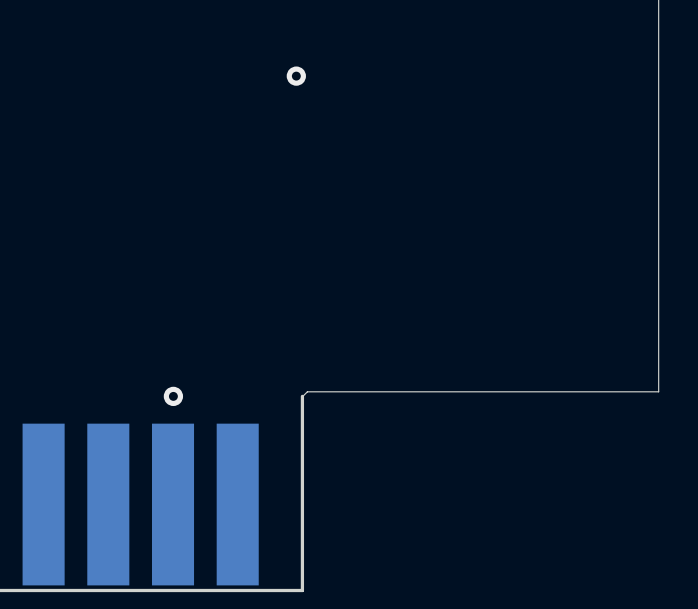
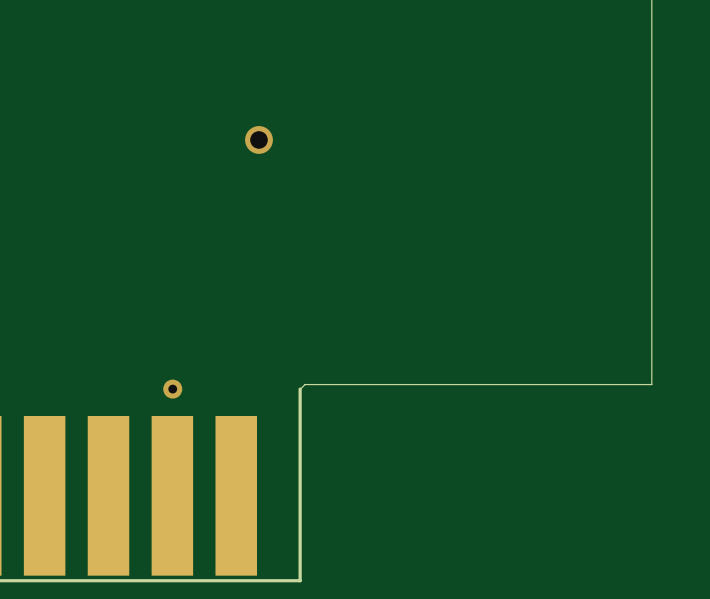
via: (296, 76) -> none
via: none -> (258, 139)

